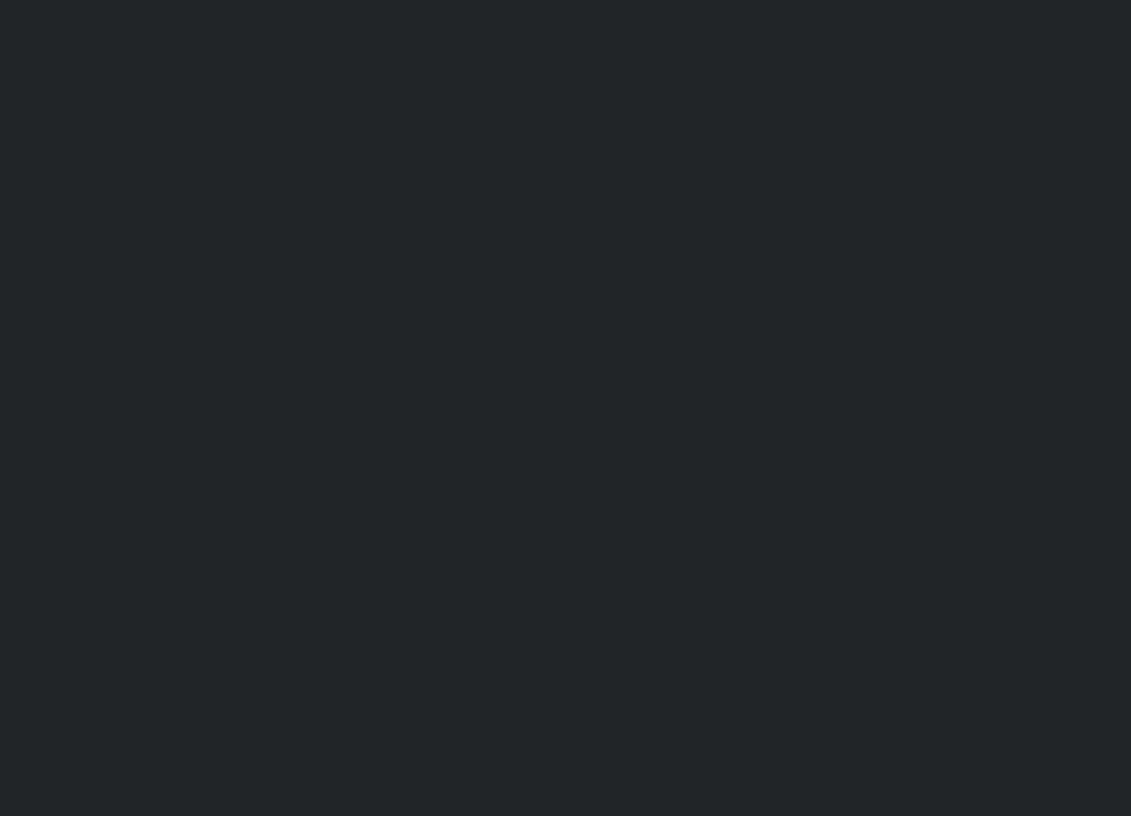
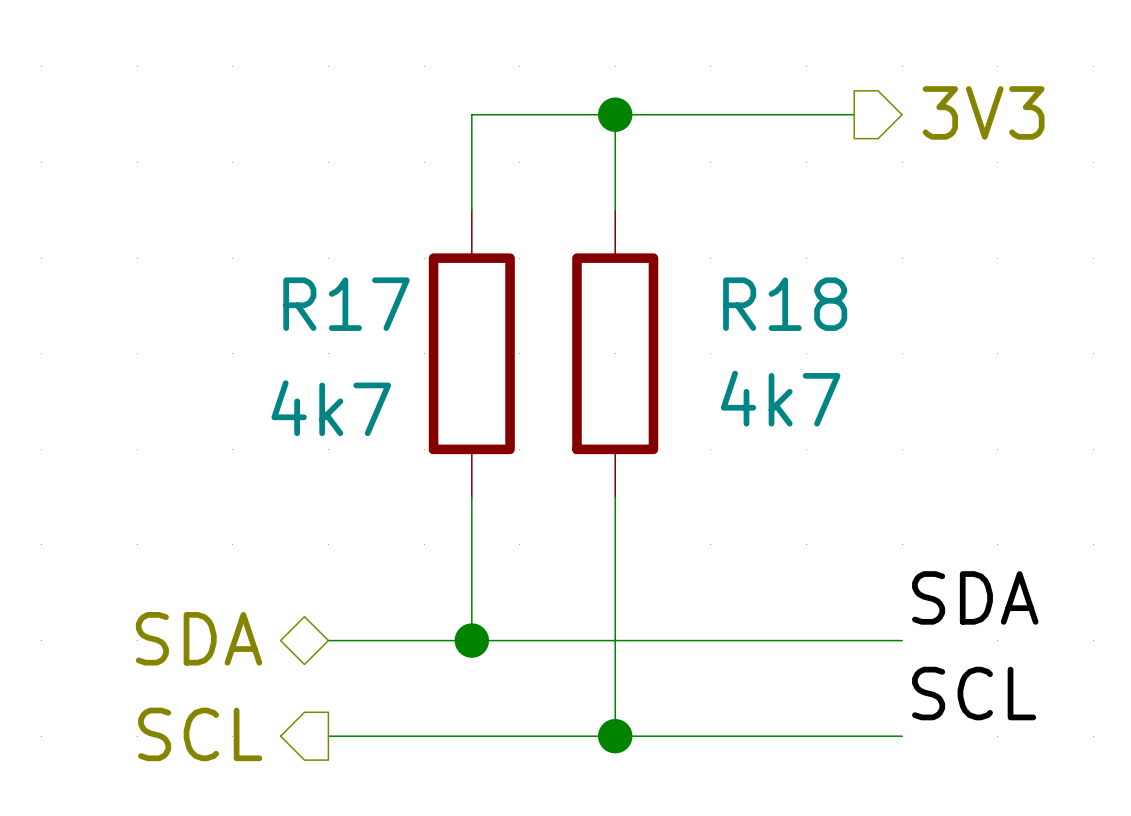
hierarchical label: none -> 3V3 (983, 112)
wire: none -> (615, 114) (615, 210)
junction: none -> (615, 114)
wire: none -> (854, 114) (471, 114) (471, 210)
R17: none -> 4k7 (471, 353)
R18: none -> 4k7 (615, 353)
wire: none -> (471, 497) (471, 640)
wire: none -> (615, 497) (615, 736)
label: none -> SDA (975, 597)
hierarchical label: none -> SDA (199, 638)
wire: none -> (328, 640) (902, 640)
junction: none -> (471, 640)
label: none -> SCL (974, 693)
hierarchical label: none -> SCL (200, 734)
wire: none -> (328, 736) (902, 736)
junction: none -> (615, 736)

